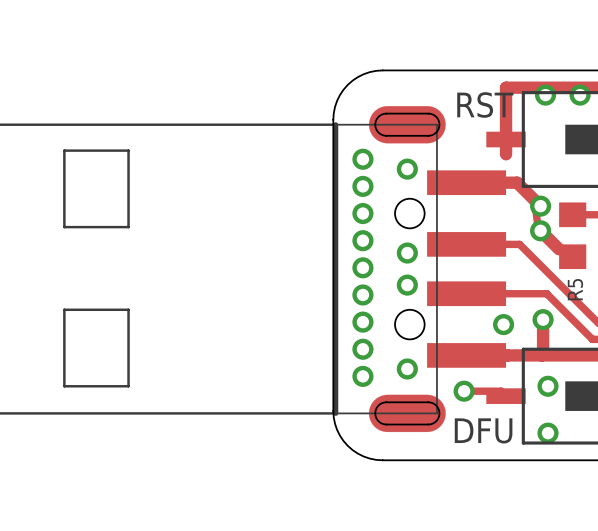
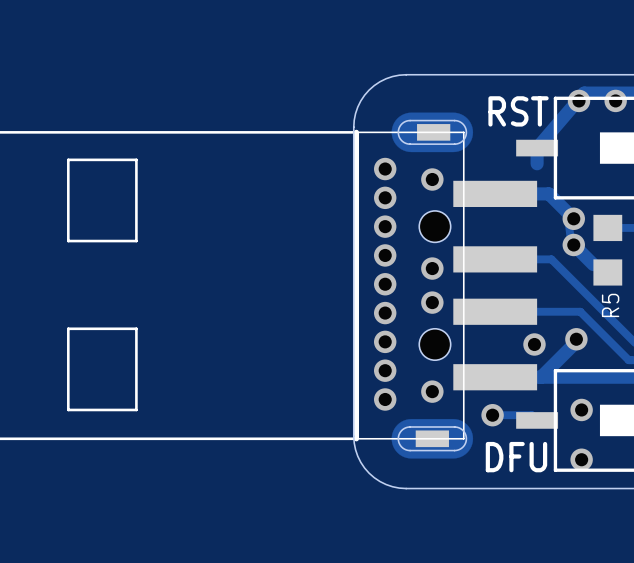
track: (550, 87) (506, 87) (506, 139) -> (584, 93) (537, 148)
track: (543, 319) (541, 355) -> none
track: none -> (579, 339) (541, 377)

